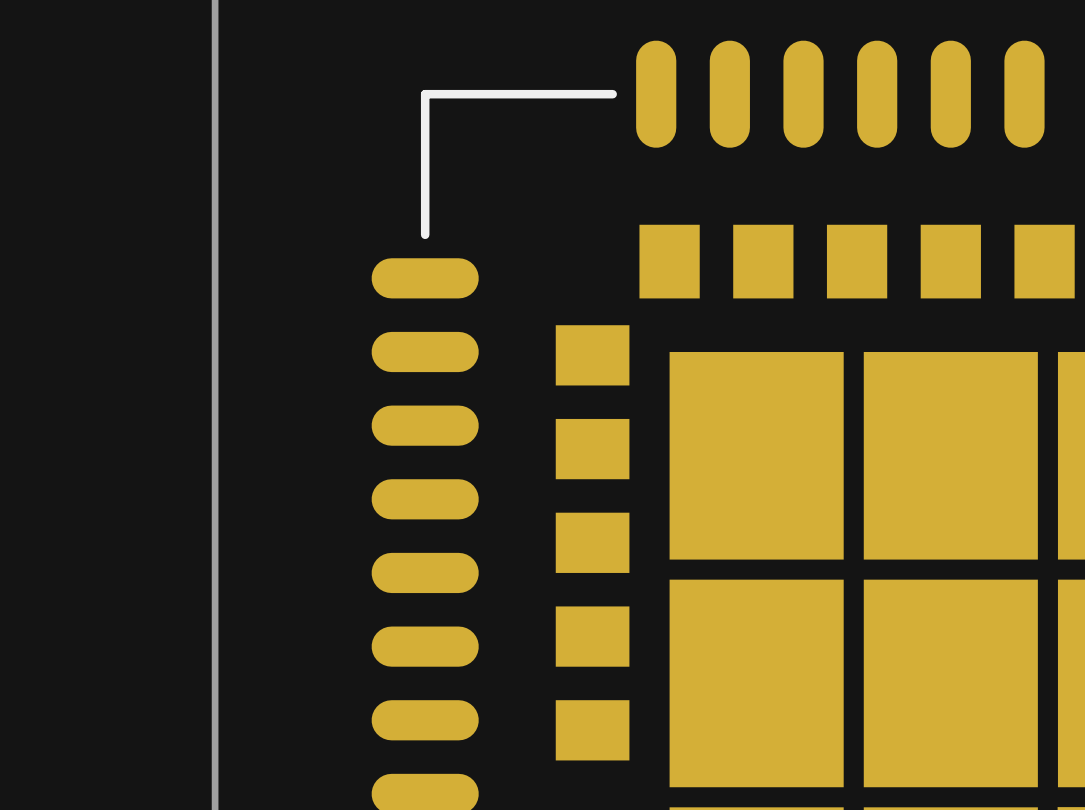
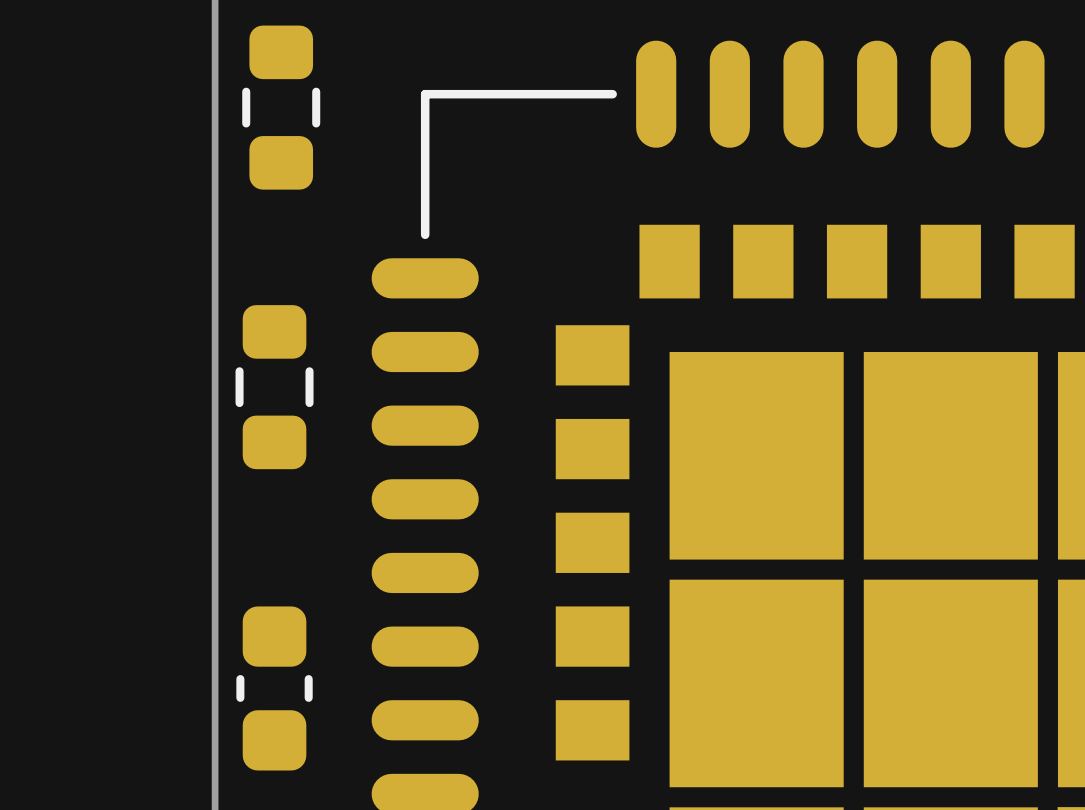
part: none -> (281, 107)
part: none -> (274, 387)
part: none -> (274, 688)

